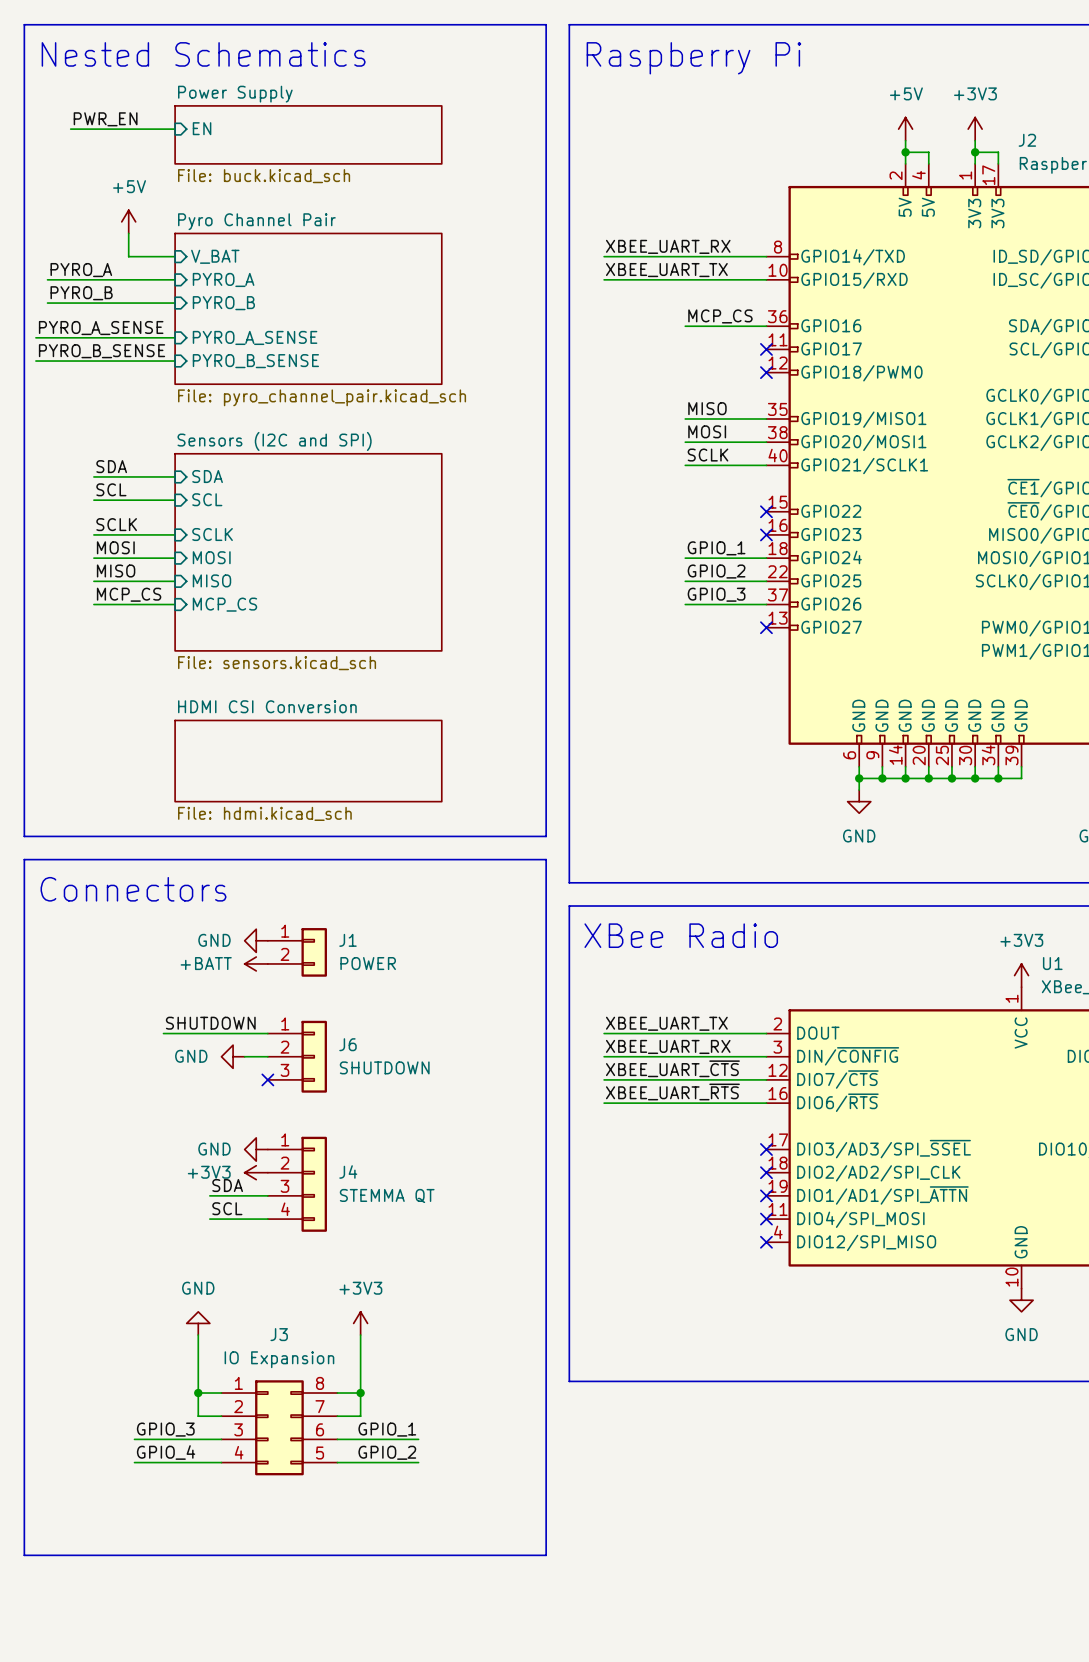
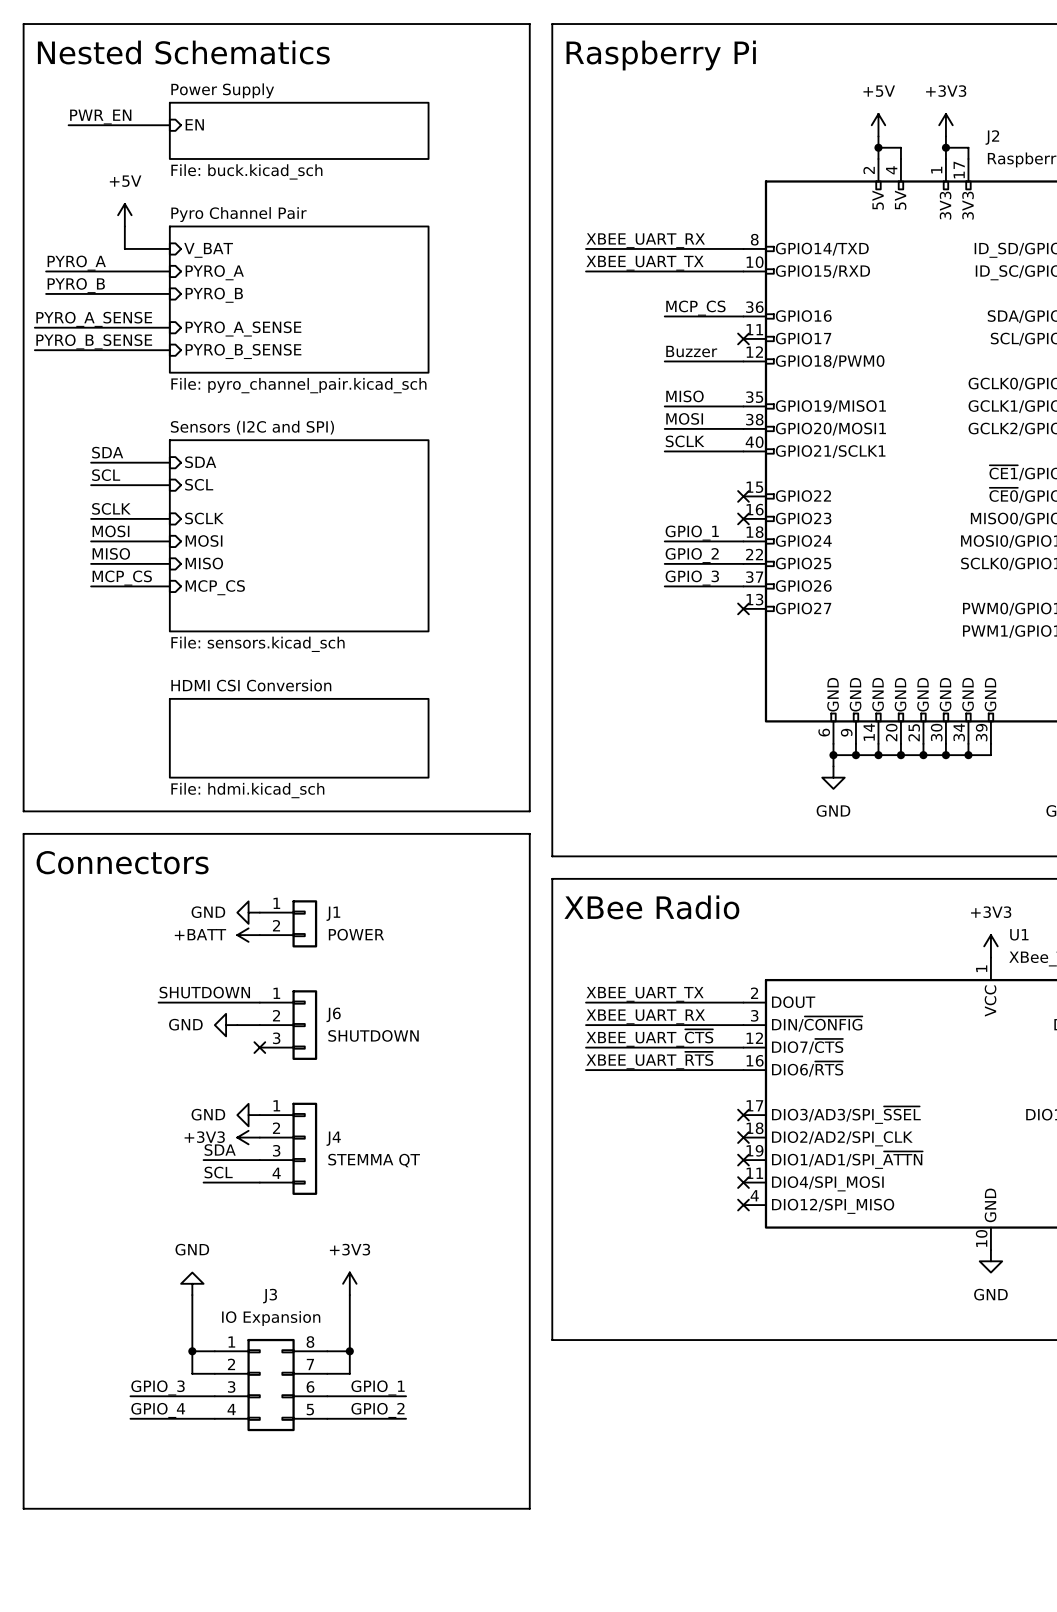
label: none -> Buzzer (691, 351)
wire: none -> (664, 361) (743, 361)
no-connect mark: (766, 372) -> none

